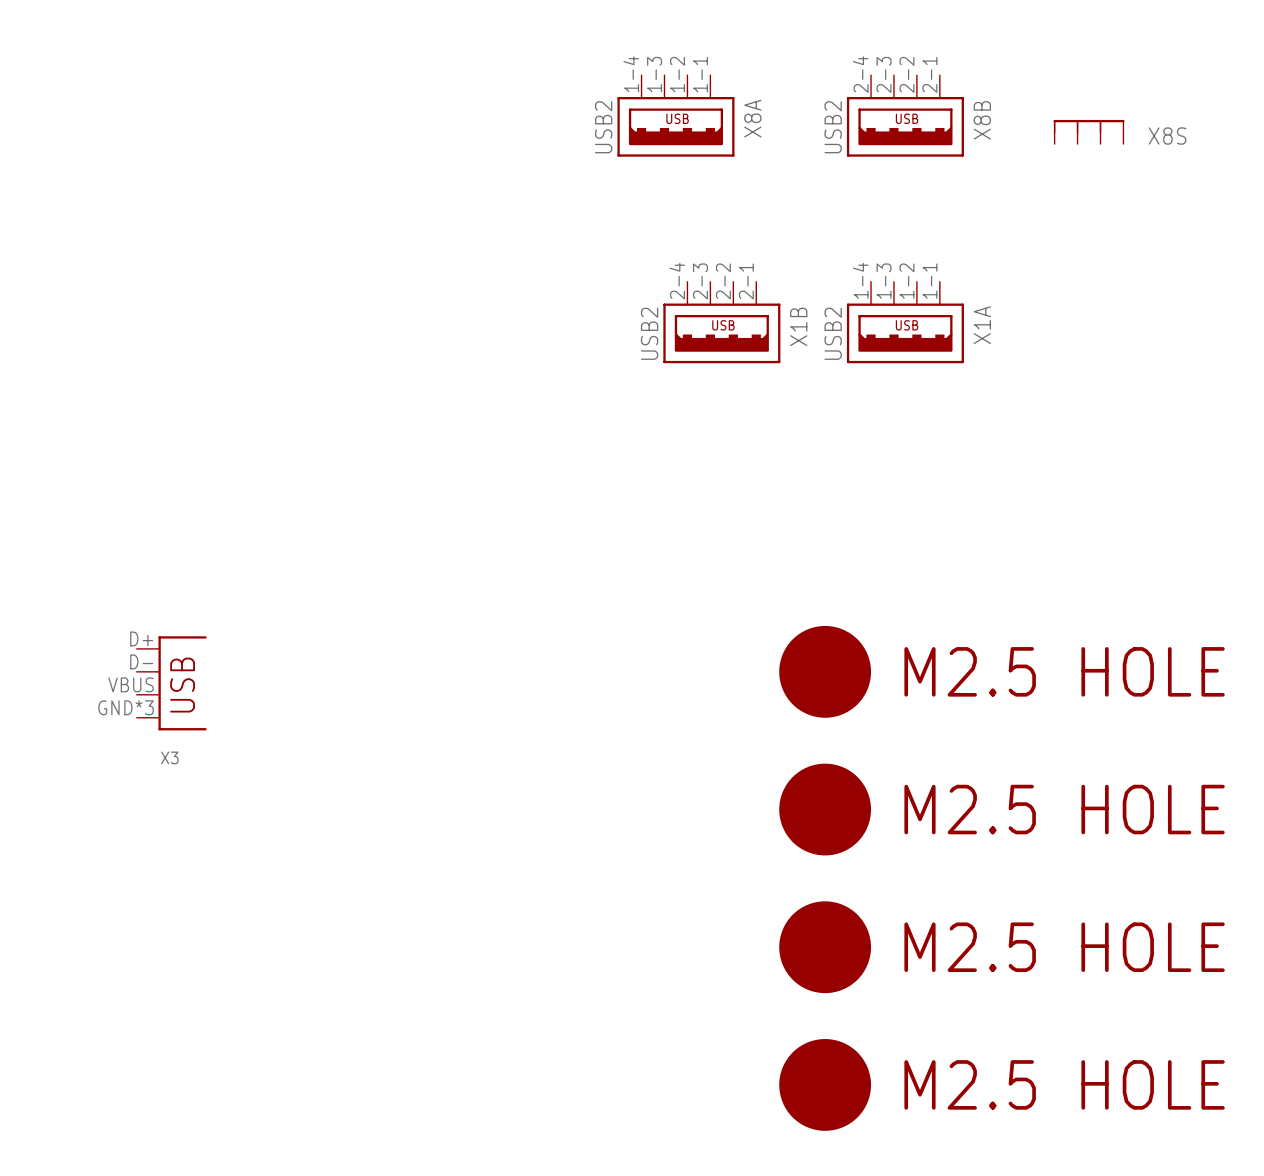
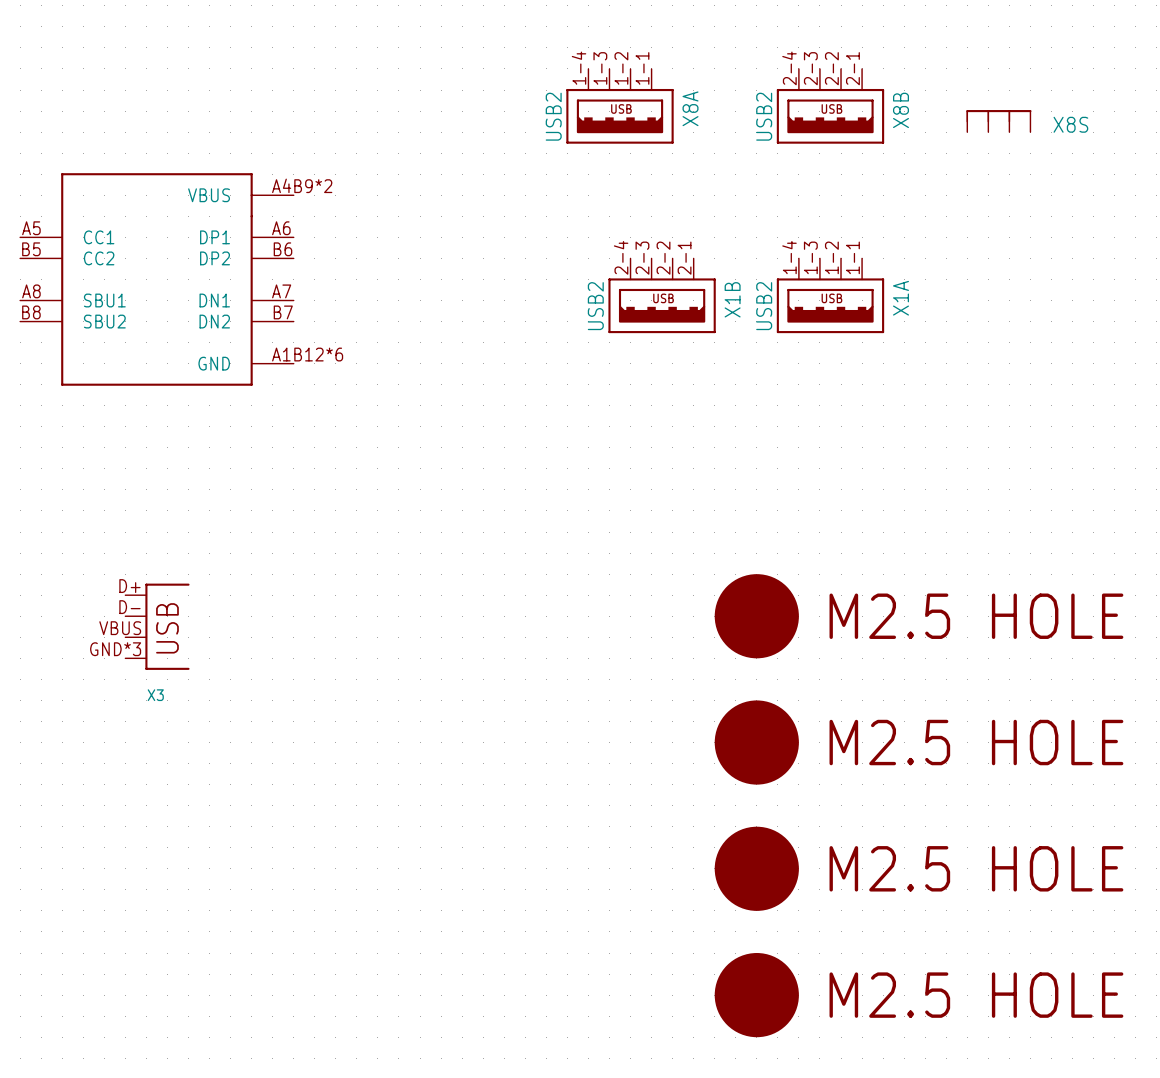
part: none -> (156, 279)

